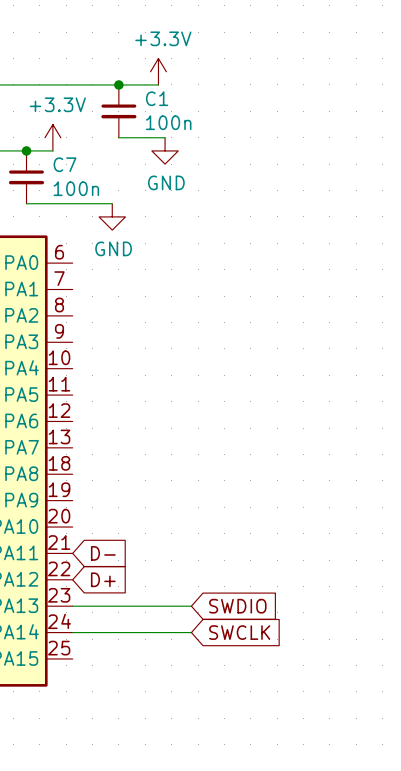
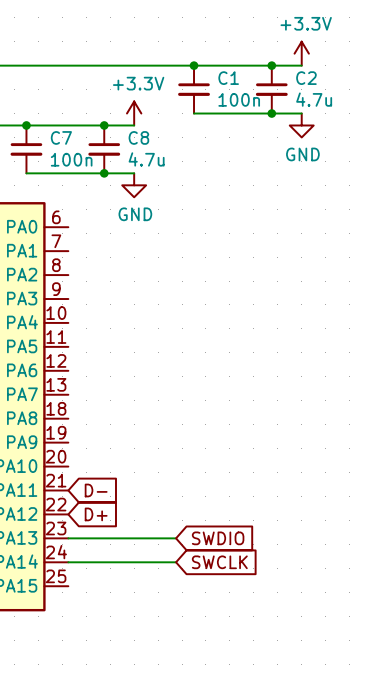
power symbol: +3.3V (158, 71) -> none
power symbol: none -> +3.3V (301, 53)
junction: (118, 84) -> none
wire: none -> (146, 65) (301, 65)
junction: none -> (194, 65)
junction: none -> (271, 65)
C1 position: (118, 111) -> (194, 89)
C2: none -> 4.7u (271, 89)
power symbol: +3.3V (52, 137) -> none
wire: (118, 137) (165, 137) -> none
power symbol: none -> +3.3V (134, 113)
wire: none -> (194, 113) (301, 113)
junction: none -> (271, 113)
wire: none -> (50, 125) (134, 125)
junction: none -> (104, 125)
power symbol: GND (165, 150) -> none
power symbol: none -> GND (301, 125)
C8: none -> 4.7u (104, 149)
wire: none -> (104, 173) (134, 173)
junction: none -> (104, 173)
power symbol position: GND (112, 216) -> GND (134, 185)

